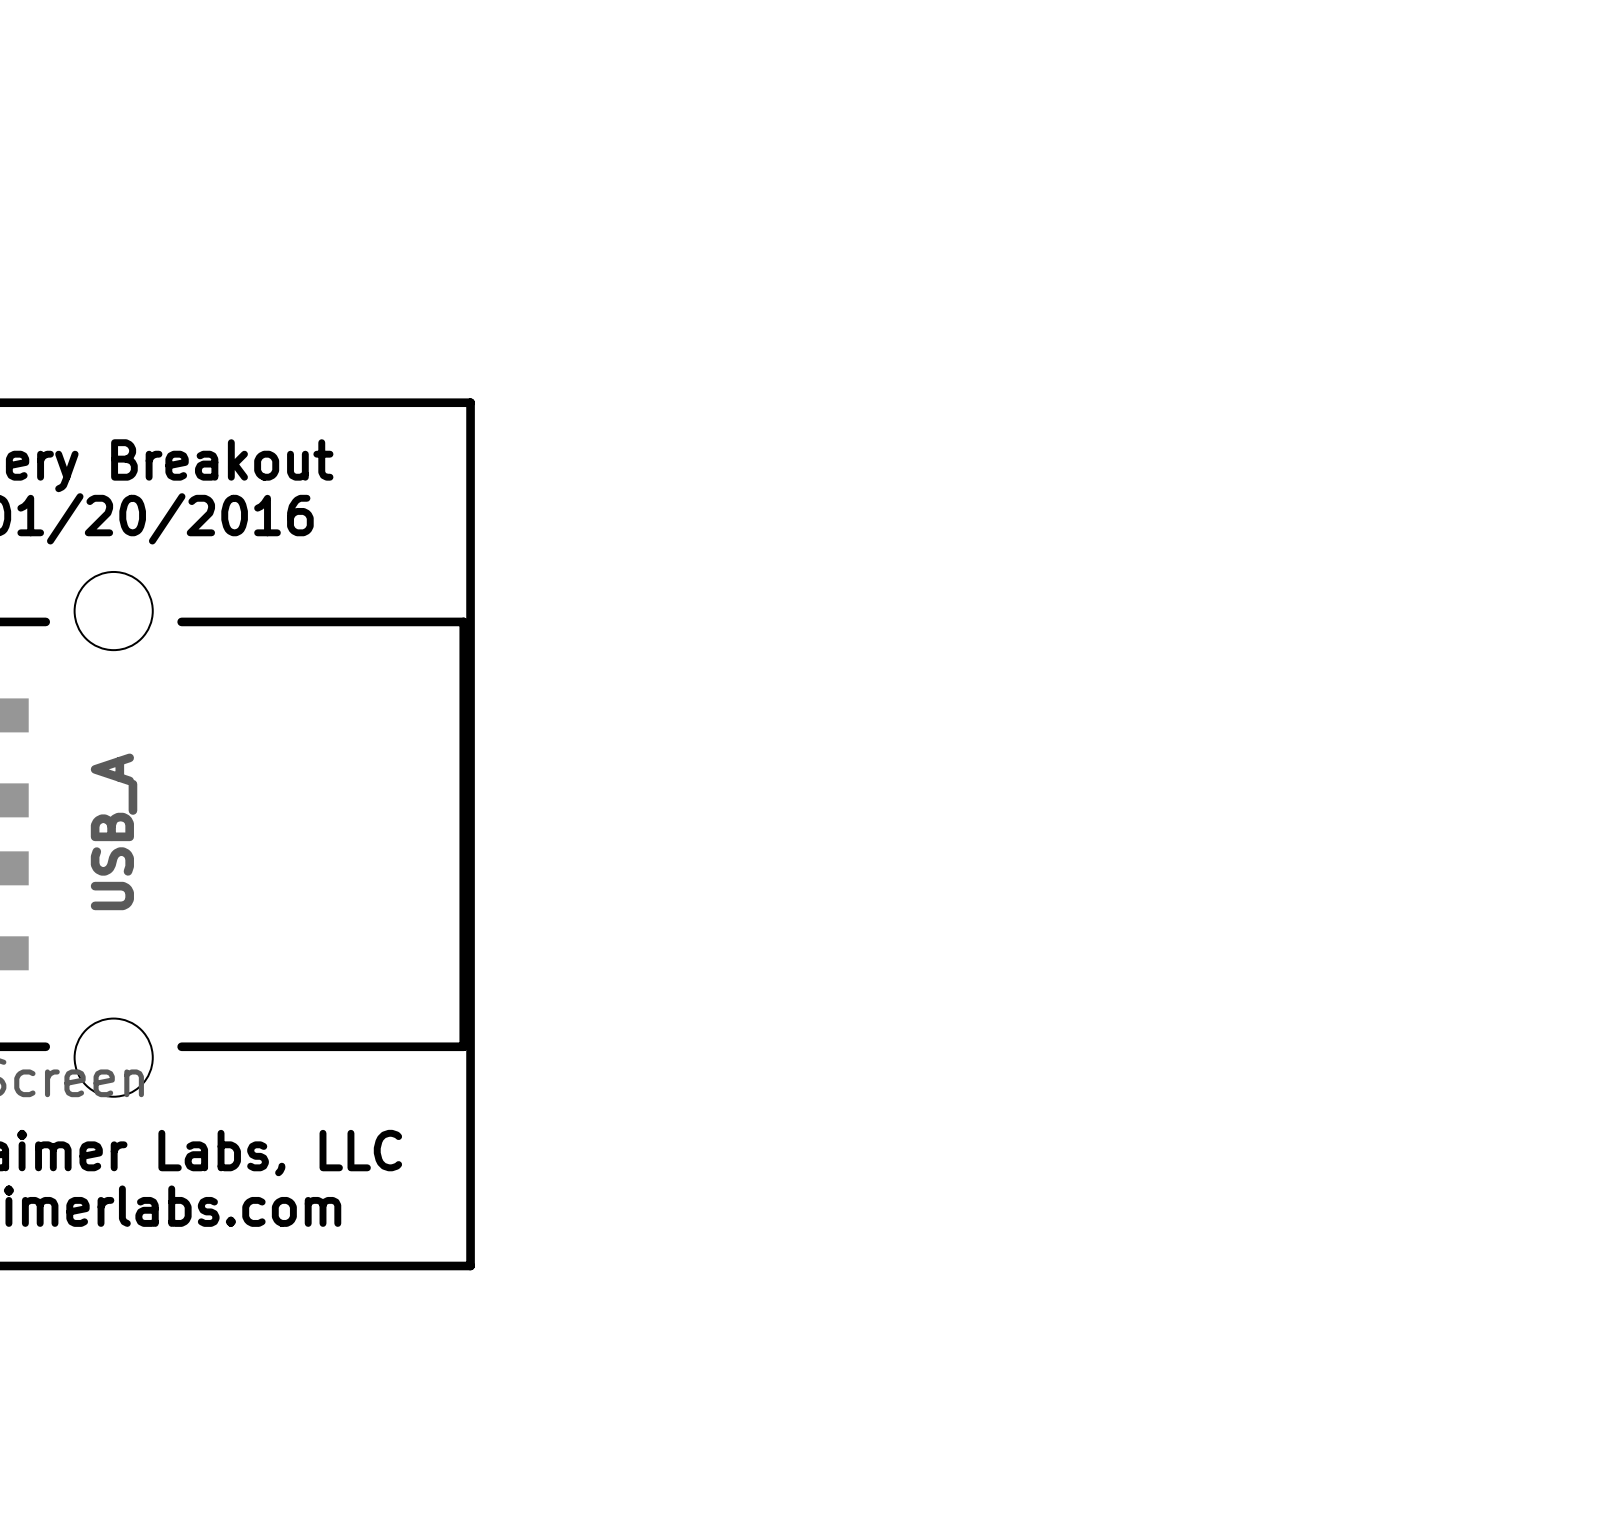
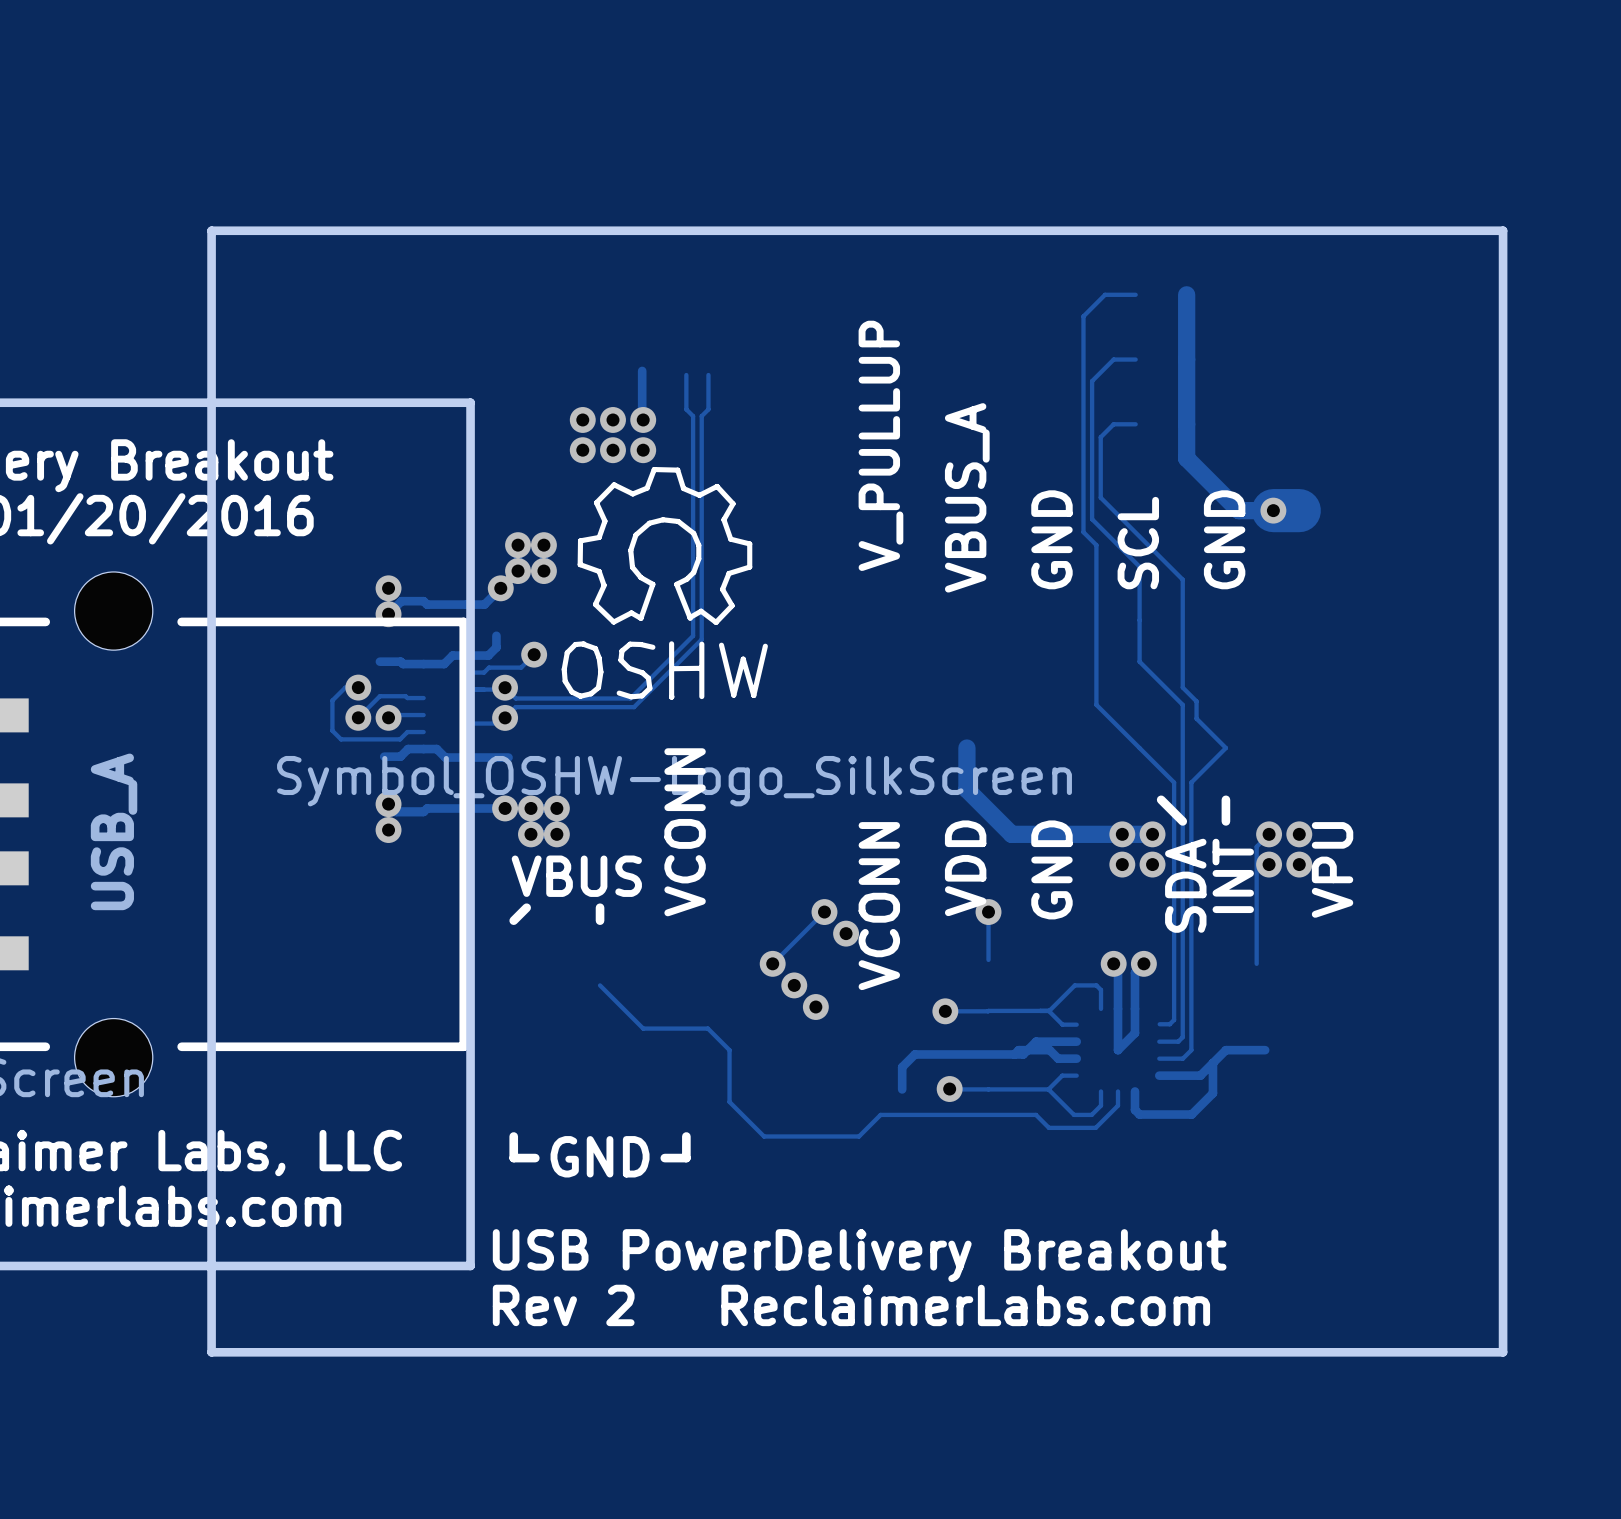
board edge: none -> (211, 230) (1503, 230) (1503, 1352) (211, 1352) (211, 230)
track: none -> (1135, 294) (1105, 294) (1083, 316) (1083, 532) (1096, 545) (1096, 704) (1174, 782) (1174, 1019) (1169, 1024) (1159, 1024)
track: none -> (1186, 294) (1186, 458) (1238, 510) (1299, 510)
track: none -> (1135, 359) (1113, 359) (1092, 381) (1092, 519) (1139, 566) (1139, 661) (1182, 704) (1182, 1037) (1178, 1041) (1159, 1041)
track: none -> (642, 370) (643, 419)
track: none -> (686, 375) (686, 409) (693, 416) (693, 635) (630, 698) (515, 698) (505, 687) (503, 689) (466, 689)
track: none -> (708, 375) (708, 409) (701, 416) (701, 639) (634, 707) (515, 707) (499, 723) (466, 723)
via: none -> (582, 419)
via: none -> (612, 419)
via: none -> (643, 419)
track: none -> (1135, 424) (1113, 424) (1100, 437) (1100, 497) (1182, 579) (1182, 687) (1196, 701) (1196, 718) (1225, 748) (1191, 782) (1191, 1050) (1182, 1058) (1159, 1058)
text: none -> V_PULLUP (880, 445)
via: none -> (582, 450)
via: none -> (612, 450)
via: none -> (643, 450)
drawing: none -> [561, 466, 768, 700]
text: none -> VBUS_A (967, 497)
via: none -> (1273, 510)
text: none -> GND (1051, 539)
text: none -> GND (1224, 539)
text: none -> SCL (1138, 543)
via: none -> (518, 545)
via: none -> (543, 545)
via: none -> (518, 571)
via: none -> (543, 571)
via: none -> (388, 588)
track: none -> (500, 588) (484, 604) (427, 604) (423, 601) (401, 601) (388, 614)
via: none -> (500, 588)
via: none -> (388, 614)
track: none -> (496, 635) (496, 647) (488, 655) (452, 655) (444, 664) (403, 664) (400, 661) (379, 661)
track: none -> (534, 654) (521, 667) (489, 667) (484, 672) (466, 672)
via: none -> (534, 654)
track: none -> (358, 687) (345, 687) (332, 700) (332, 730) (341, 739) (400, 739) (407, 732) (423, 732)
via: none -> (358, 687)
via: none -> (505, 687)
track: none -> (423, 698) (379, 696) (358, 717)
track: none -> (423, 715) (391, 715) (388, 717)
via: none -> (358, 717)
via: none -> (388, 717)
via: none -> (505, 717)
track: none -> (966, 748) (966, 789) (1011, 834) (1152, 834)
track: none -> (384, 756) (400, 756) (408, 749) (436, 749) (445, 757) (508, 757)
line: none -> (1161, 799) (1182, 821)
line: none -> (1225, 799) (1225, 821)
via: none -> (388, 804)
track: none -> (505, 808) (427, 808) (423, 811) (388, 812)
via: none -> (505, 808)
via: none -> (530, 808)
via: none -> (556, 808)
via: none -> (388, 830)
text: none -> VCONN (685, 832)
via: none -> (530, 834)
via: none -> (556, 834)
via: none -> (1122, 834)
via: none -> (1152, 834)
track: none -> (1269, 834) (1256, 846) (1256, 963)
via: none -> (1269, 834)
via: none -> (1299, 834)
via: none -> (1122, 864)
via: none -> (1152, 864)
via: none -> (1269, 864)
via: none -> (1299, 864)
text: none -> VDD (965, 868)
text: none -> GND (1051, 869)
text: none -> VPU (1332, 869)
text: none -> INT (1233, 875)
text: none -> VBUS (576, 876)
text: none -> SDA (1185, 885)
text: none -> VCONN (879, 906)
line: none -> (526, 907) (513, 920)
line: none -> (600, 907) (600, 920)
track: none -> (824, 912) (772, 963)
via: none -> (824, 912)
track: none -> (988, 912) (988, 959)
via: none -> (988, 912)
via: none -> (846, 933)
via: none -> (772, 963)
track: none -> (1113, 963) (1118, 968) (1118, 1050) (1135, 1033) (1135, 972) (1143, 963)
via: none -> (1113, 963)
via: none -> (1143, 963)
track: none -> (600, 985) (643, 1028) (707, 1028) (729, 1050) (729, 1101) (764, 1136) (859, 1136) (880, 1114) (1035, 1114) (1048, 1127) (1095, 1127) (1118, 1105) (1118, 1091)
via: none -> (794, 985)
via: none -> (815, 1007)
track: none -> (1101, 1008) (1101, 990) (1096, 985) (1074, 985) (1049, 1010) (988, 1010)
track: none -> (1048, 1010) (1062, 1024) (1076, 1024)
track: none -> (945, 1011) (988, 1011)
via: none -> (945, 1011)
track: none -> (1076, 1041) (1036, 1041) (1023, 1054) (914, 1054) (902, 1067) (902, 1089)
track: none -> (1265, 1050) (1225, 1050) (1200, 1075) (1159, 1075)
track: none -> (1014, 1054) (1018, 1050) (1049, 1050) (1058, 1058) (1076, 1058)
track: none -> (1212, 1063) (1212, 1093) (1191, 1114) (1139, 1114) (1135, 1109) (1135, 1091)
track: none -> (1076, 1075) (1062, 1075) (1048, 1089)
via: none -> (949, 1089)
track: none -> (950, 1089) (1048, 1089)
track: none -> (1048, 1089) (1074, 1114) (1091, 1114) (1101, 1105) (1101, 1091)
line: none -> (513, 1136) (513, 1158) (535, 1158)
line: none -> (686, 1136) (686, 1158) (664, 1158)
text: none -> GND (600, 1156)
text: none -> USB PowerDelivery Breakout (859, 1255)
text: none -> Rev 2 ReclaimerLabs.com (851, 1305)

